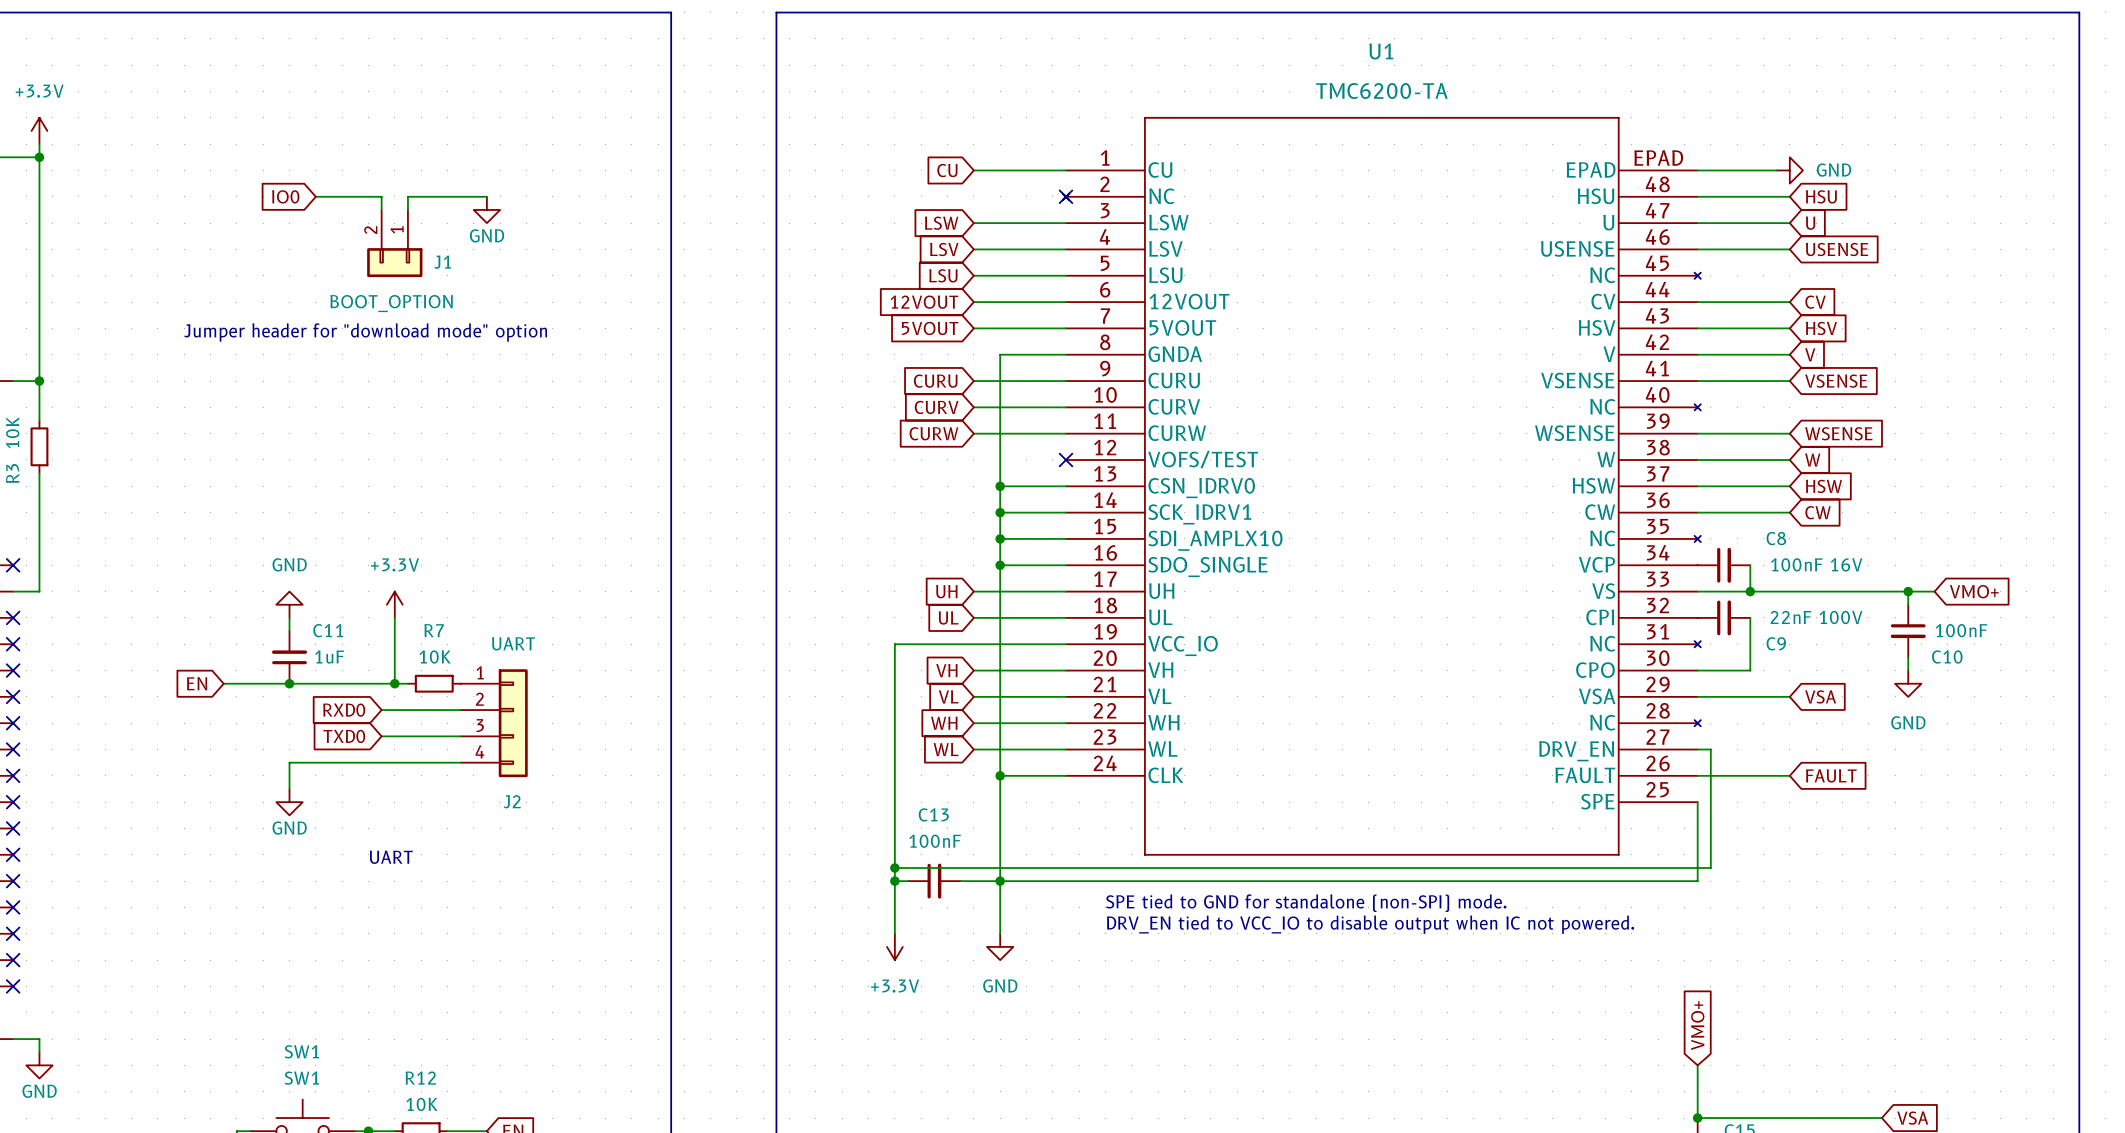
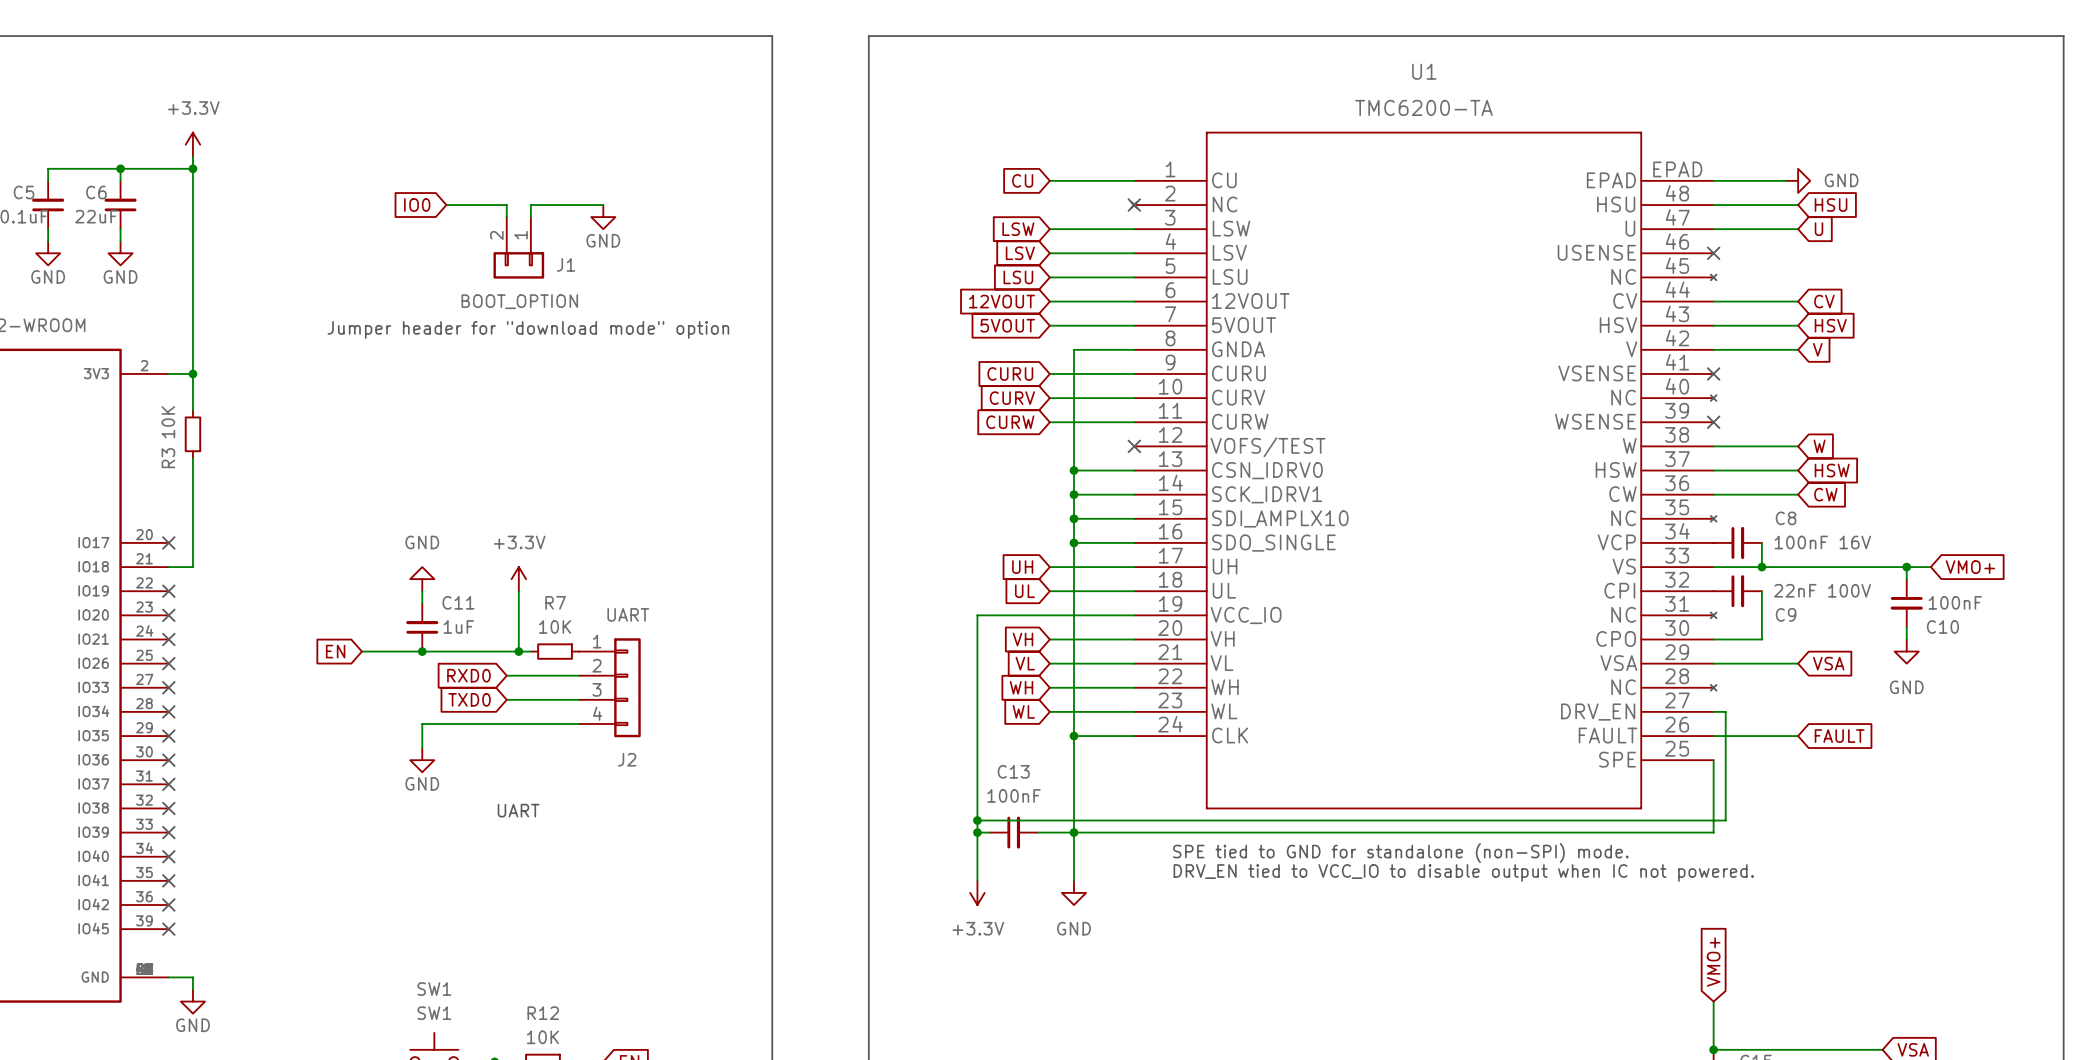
wire: (1697, 249) (1789, 249) -> none
no-connect mark: none -> (1713, 253)
global label: USENSE (1837, 249) -> none
wire: (1697, 381) (1789, 381) -> none
no-connect mark: none -> (1713, 373)
global label: VSENSE (1836, 381) -> none
wire: (1697, 433) (1789, 433) -> none
no-connect mark: none -> (1713, 422)
global label: WSENSE (1838, 433) -> none

